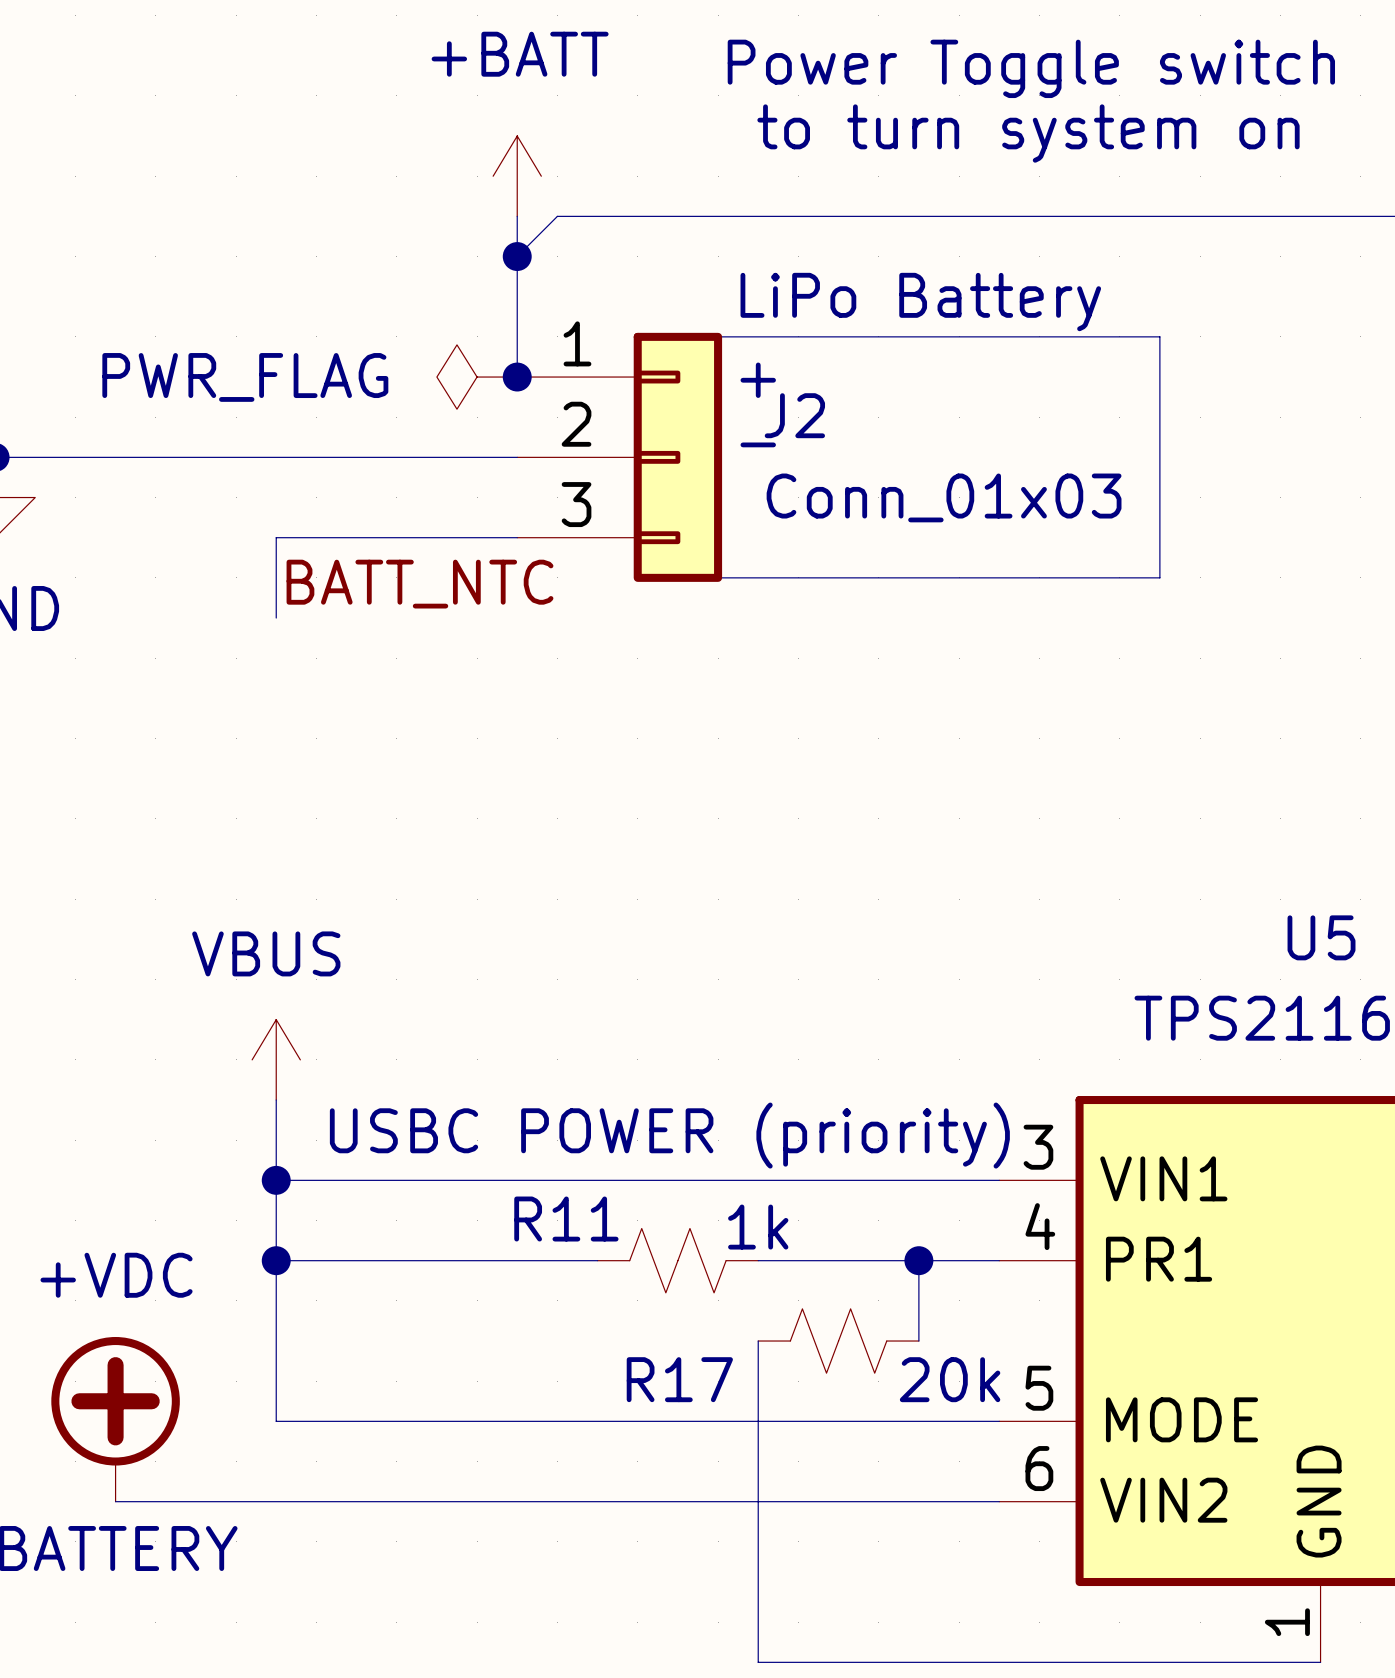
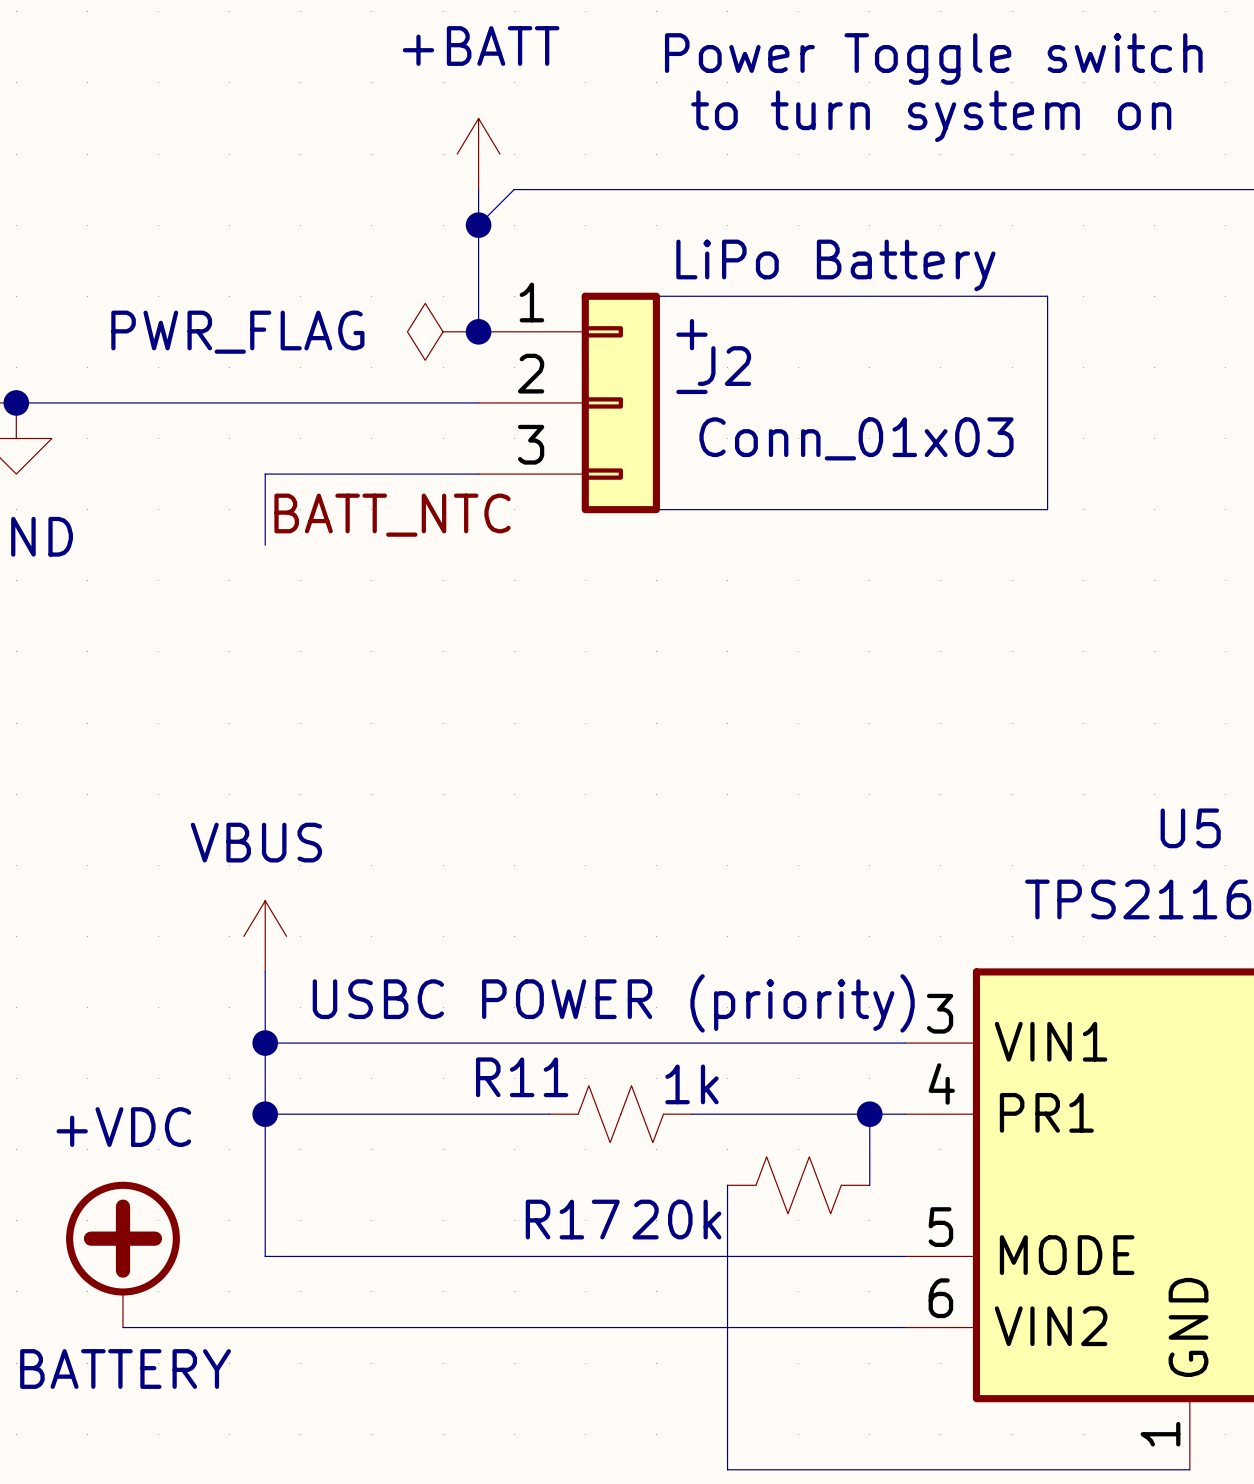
wire: (918, 1260) (918, 1341) -> (869, 1114) (869, 1185)
junction position: (918, 1260) -> (869, 1114)
wire: (758, 1341) (758, 1662) (798, 1662) -> (727, 1185) (727, 1469)
R17 position: (838, 1341) -> (798, 1185)
R17 name position: R17 (679, 1379) -> R17 (572, 1219)
R17 value position: 20k (950, 1379) -> 20k (676, 1219)

